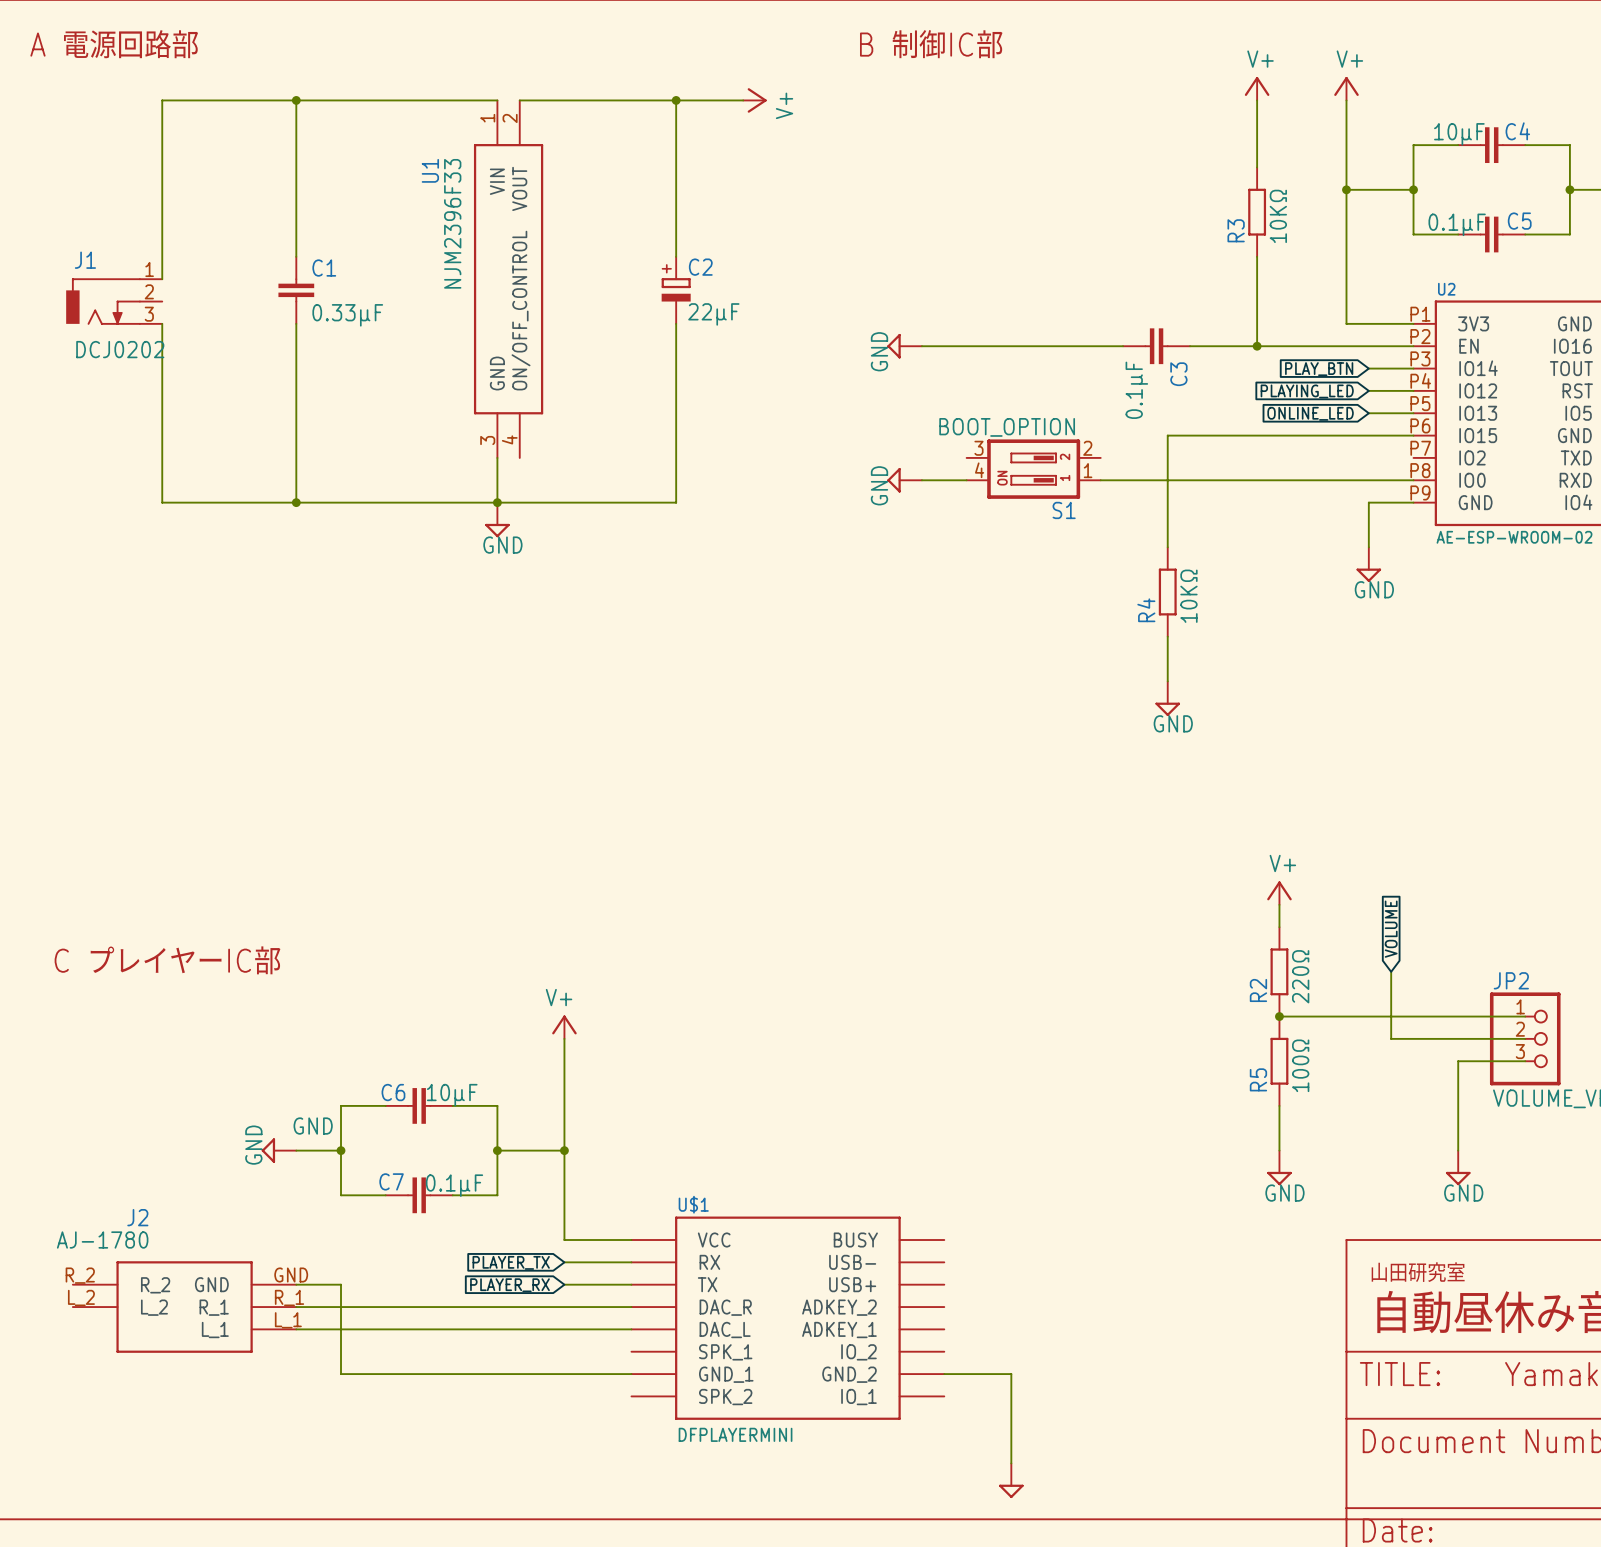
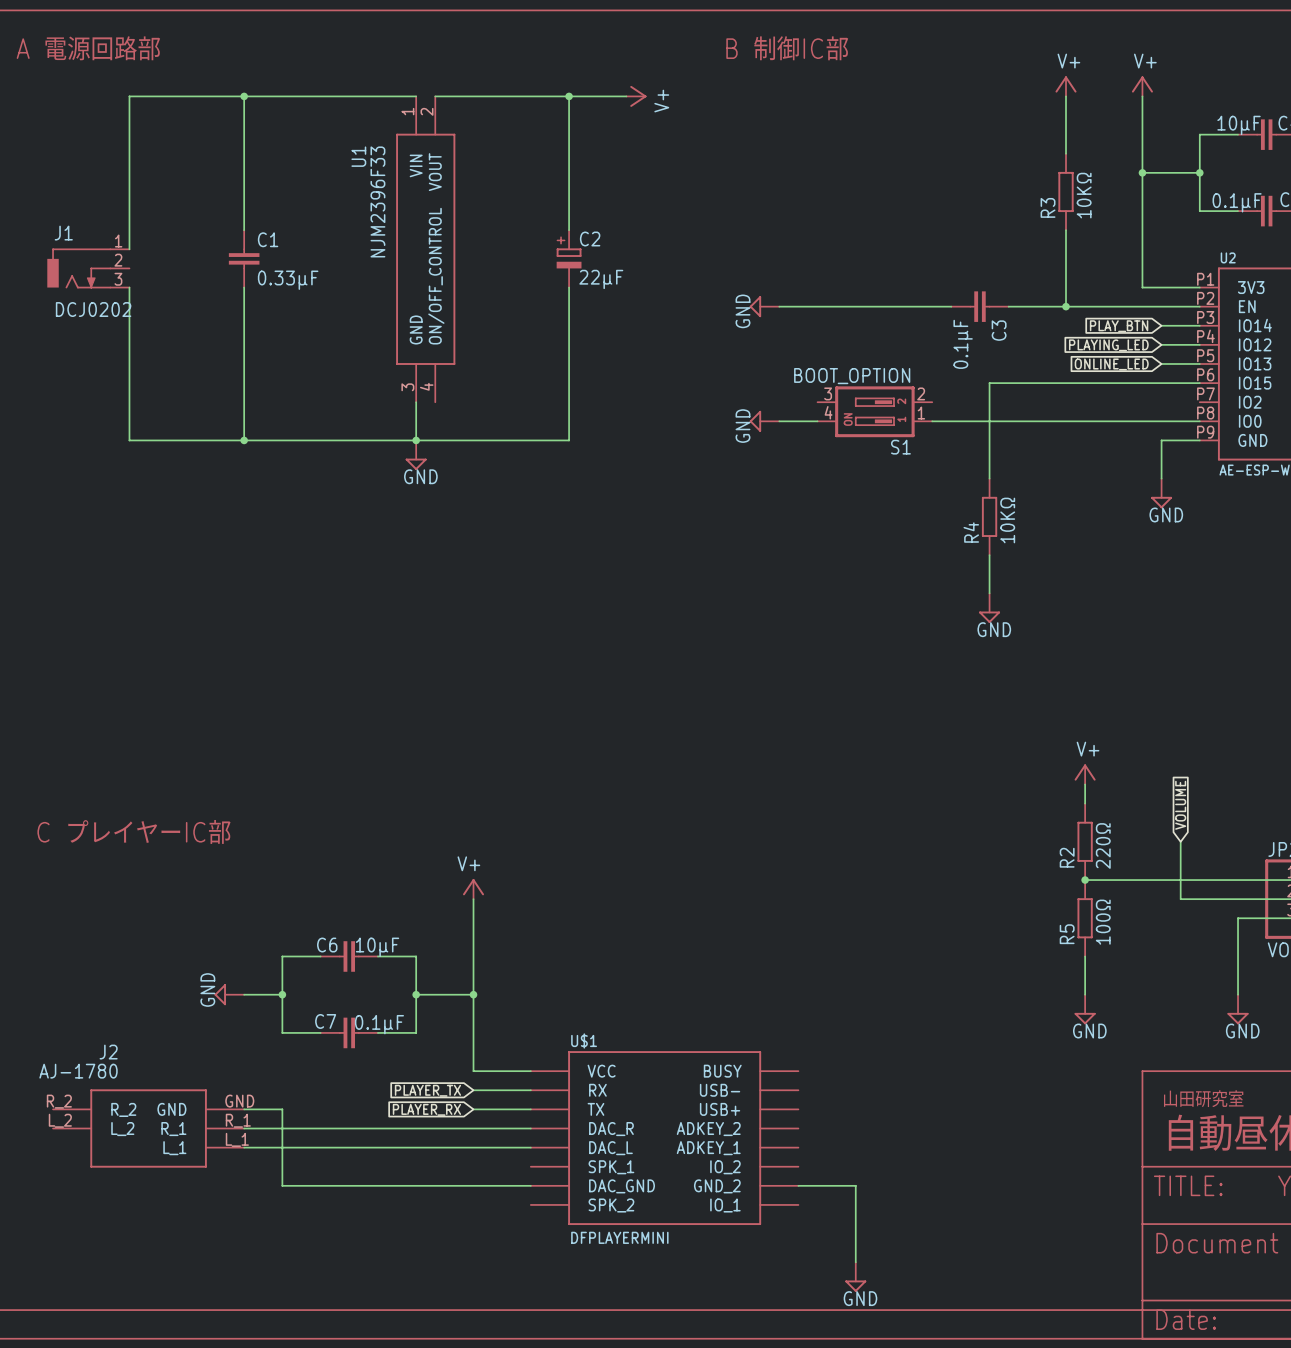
power symbol text position: GND (313, 1126) -> GND (860, 1298)
U$1 pin name: GND_1 (726, 1374) -> DAC_GND (622, 1186)

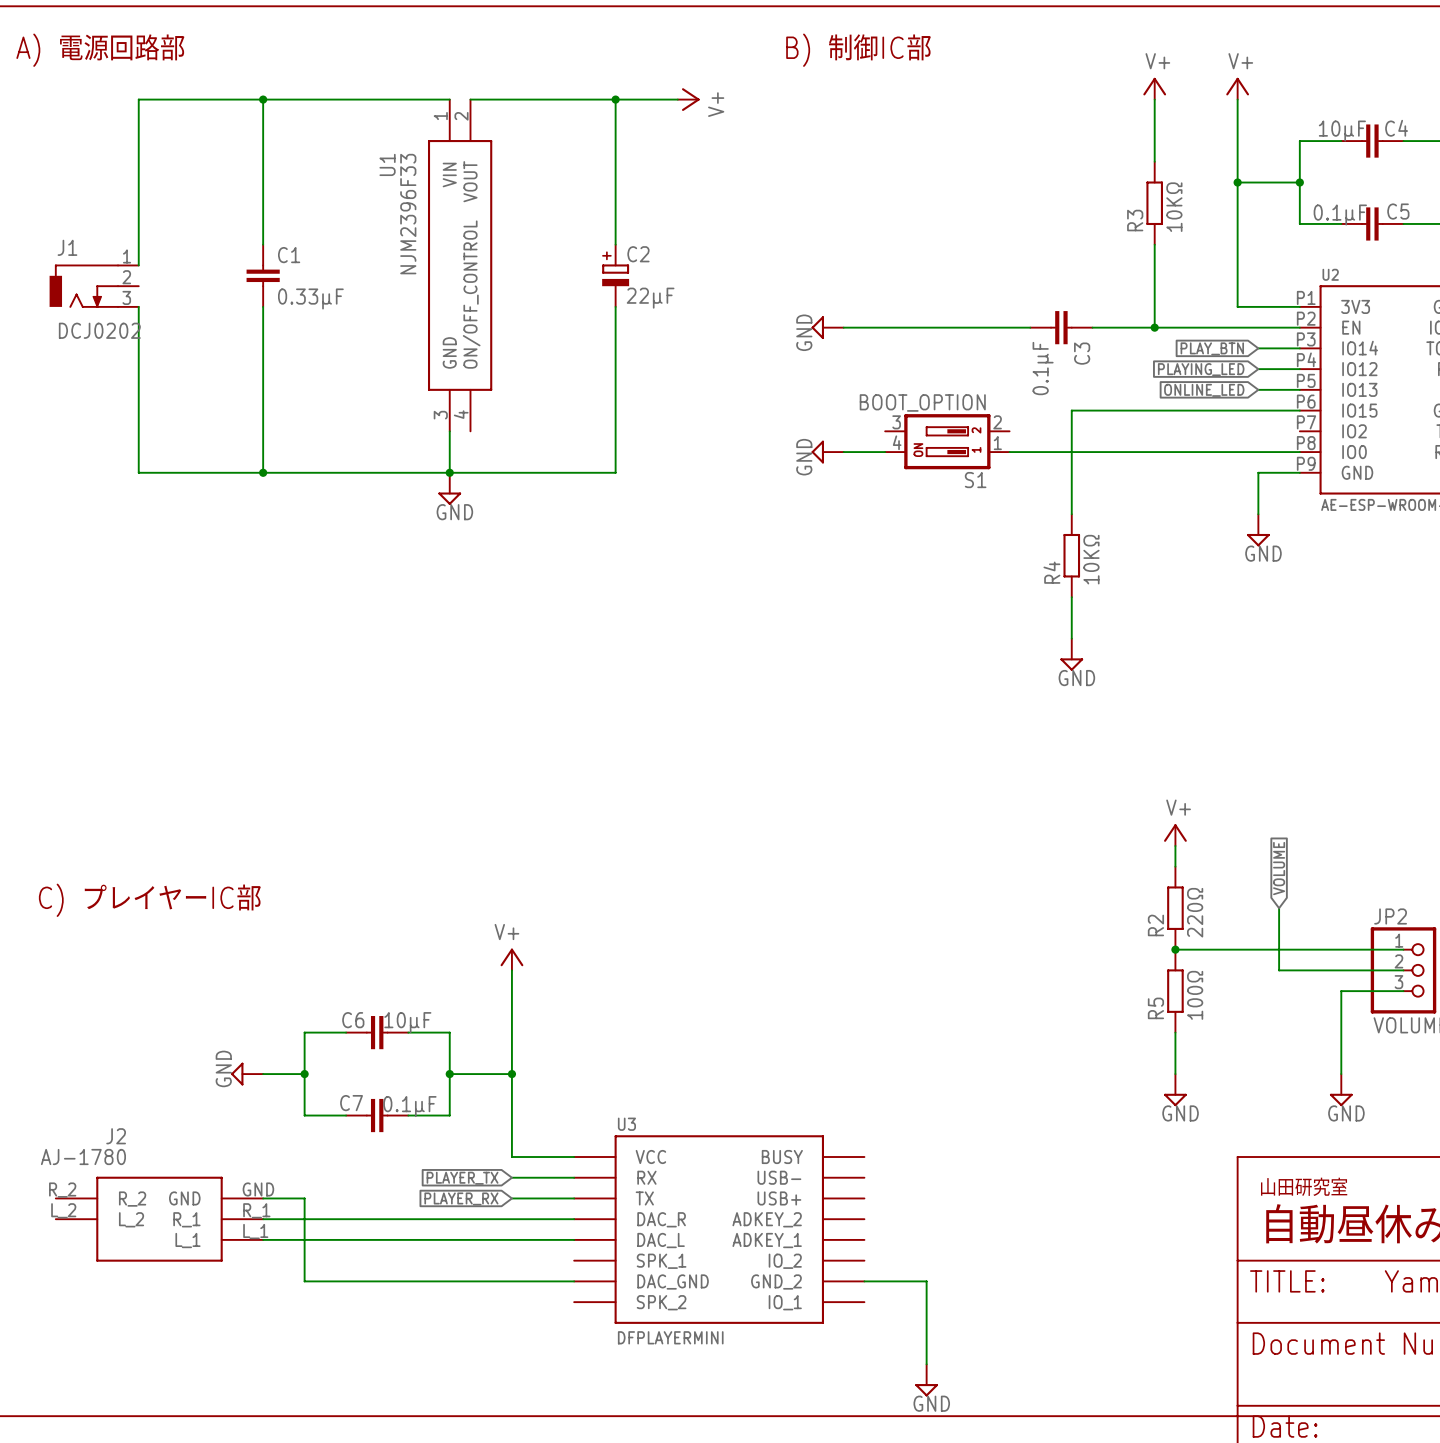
text: A 電源回路部 (88, 48) -> A) 電源回路部 (100, 50)
text: B 制御IC部 (787, 48) -> B) 制御IC部 (858, 50)
text: C プレイヤーIC部 (134, 831) -> C) プレイヤーIC部 (150, 900)
U$1 name: U$1 (584, 1040) -> U3 (626, 1124)

